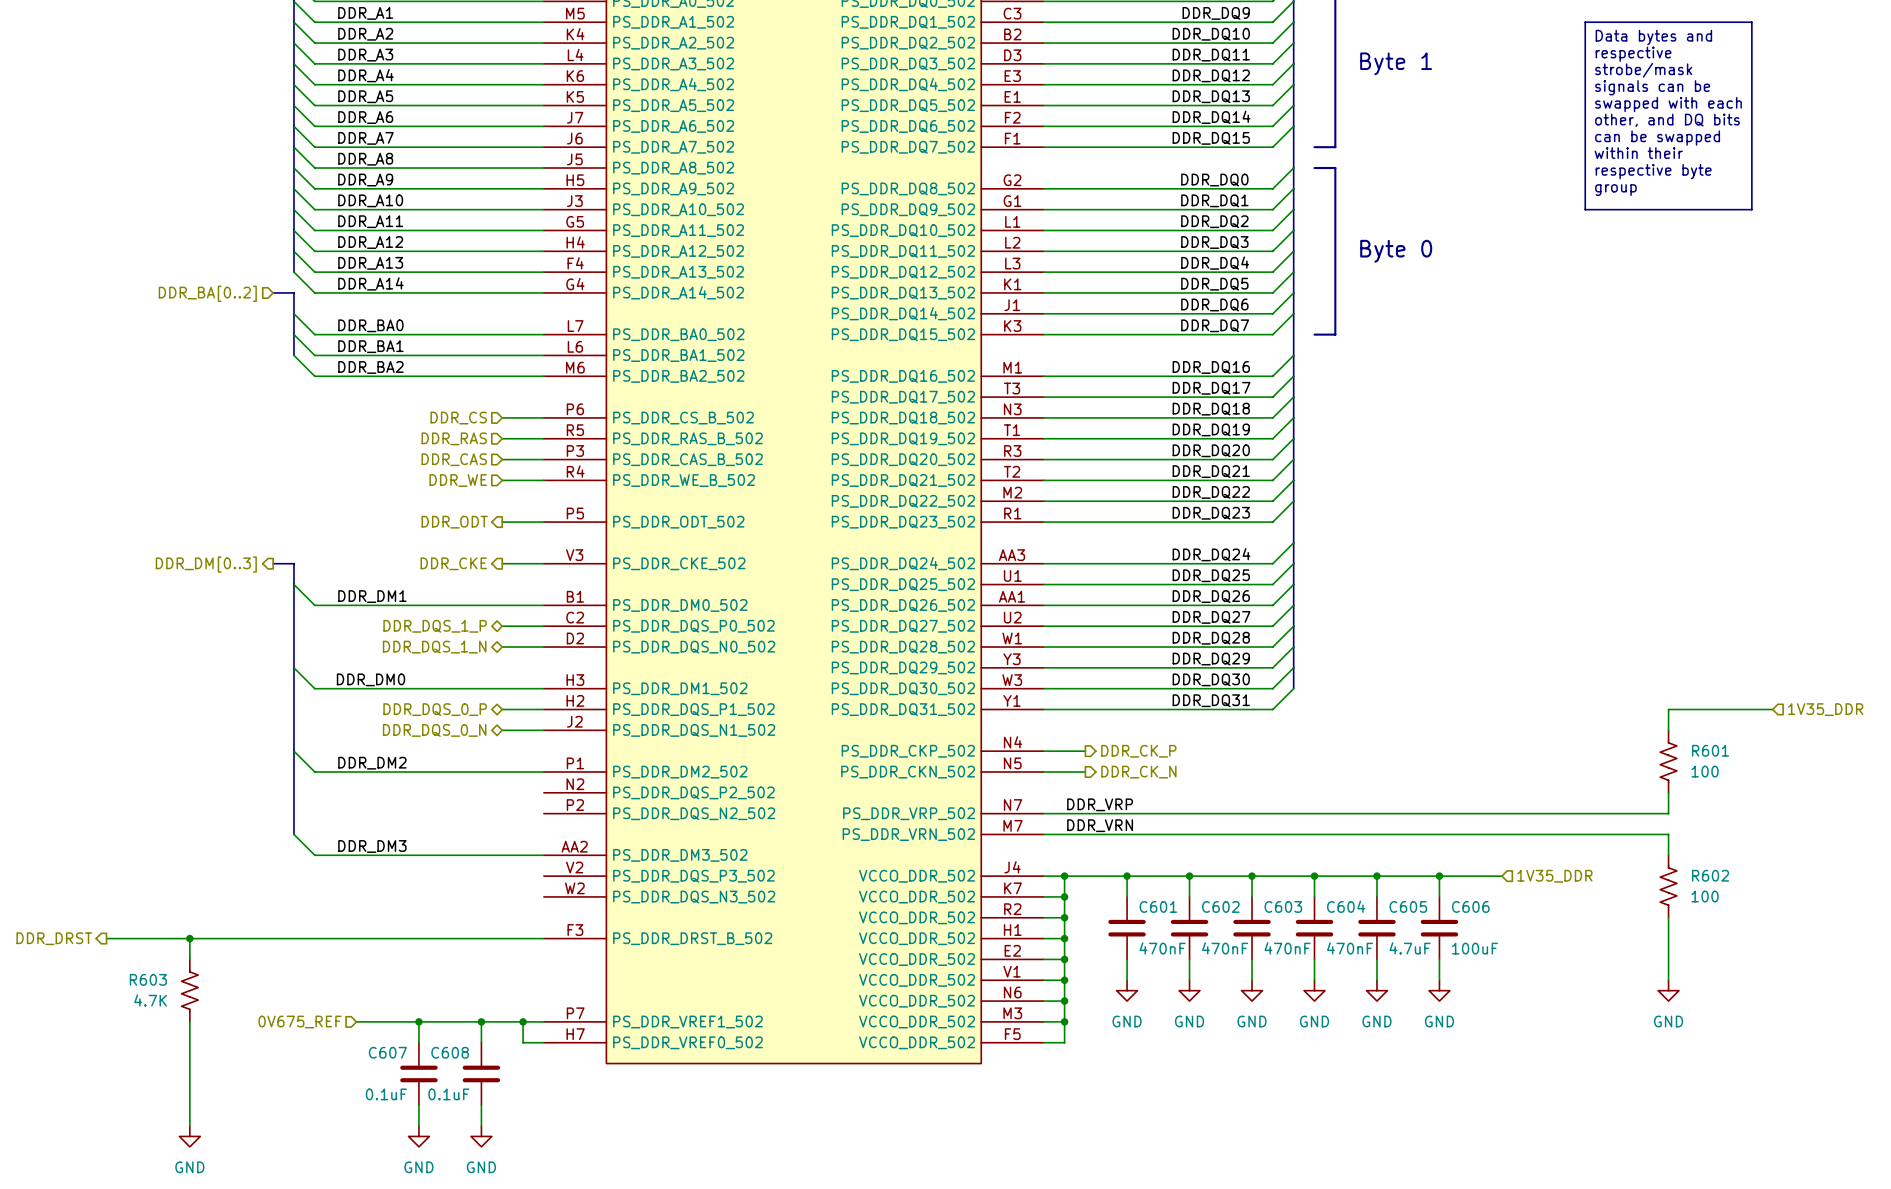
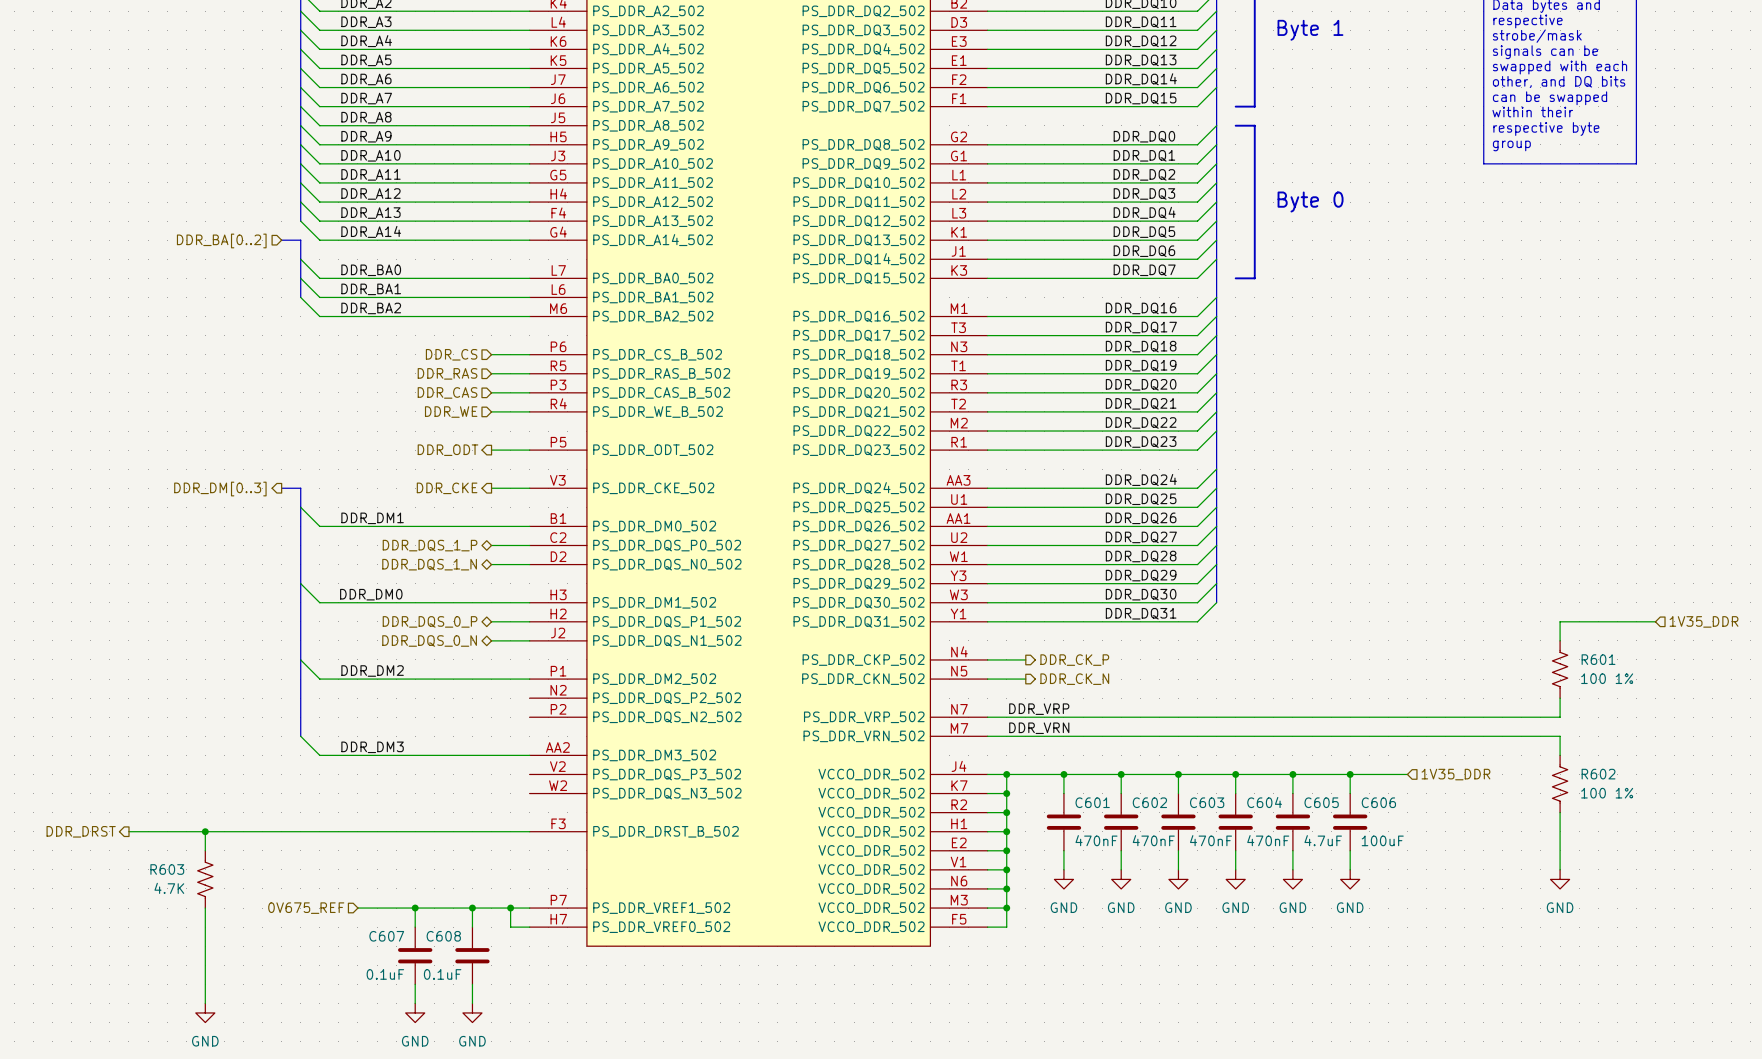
R601 value: 100 (1705, 771) -> 100 1% (1607, 678)
R602 value: 100 (1705, 896) -> 100 1% (1607, 793)

